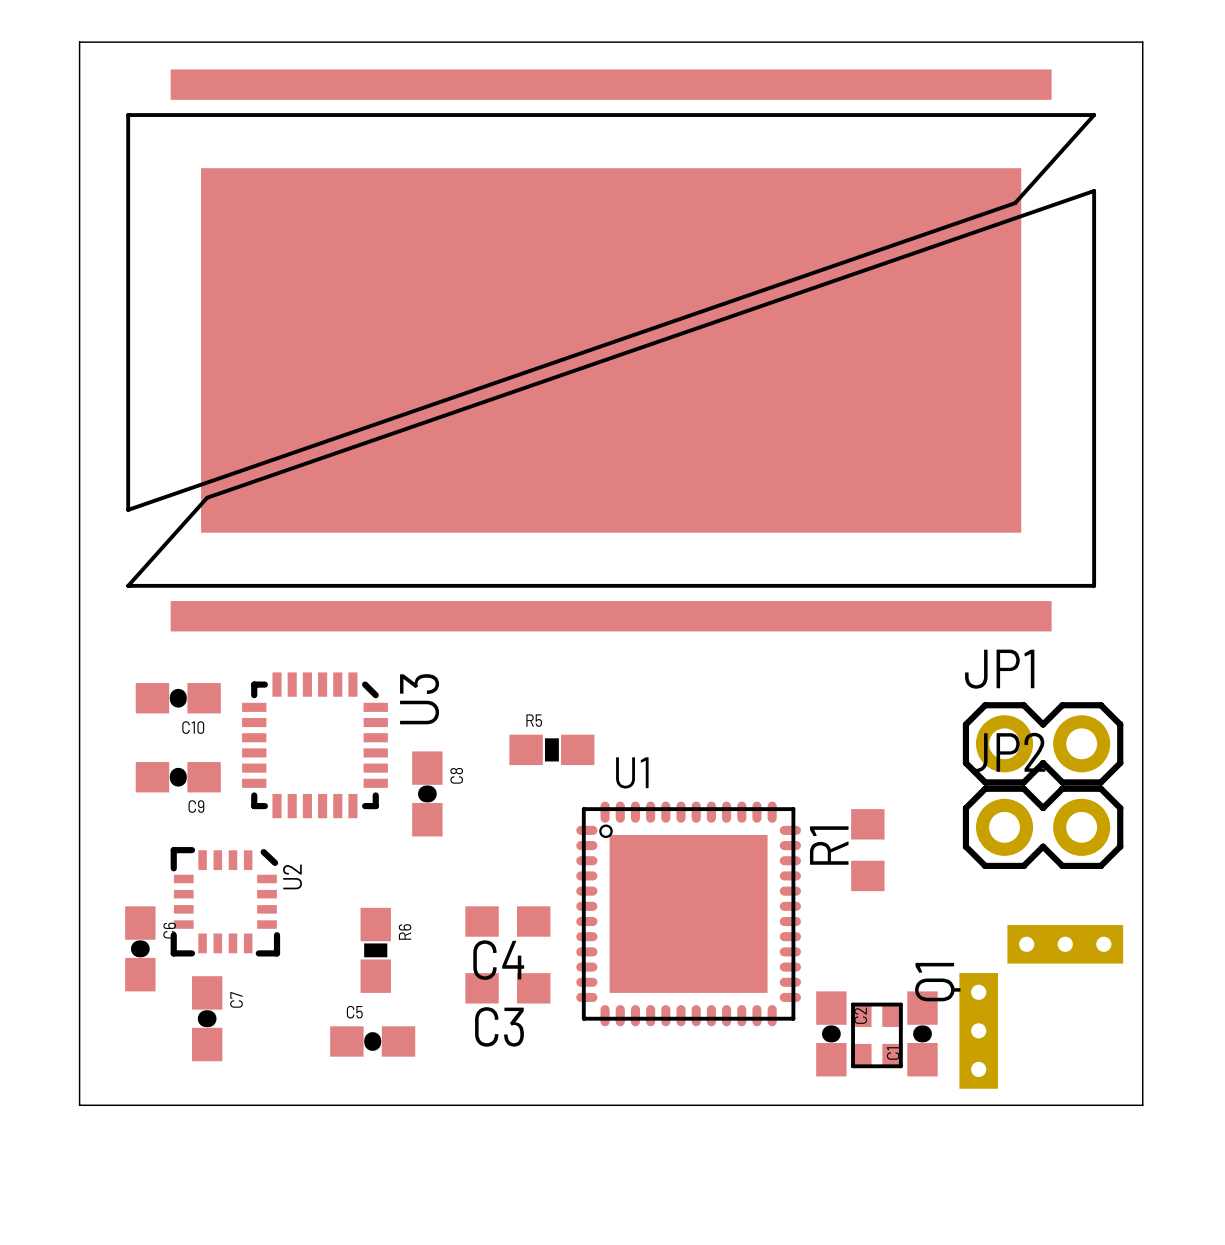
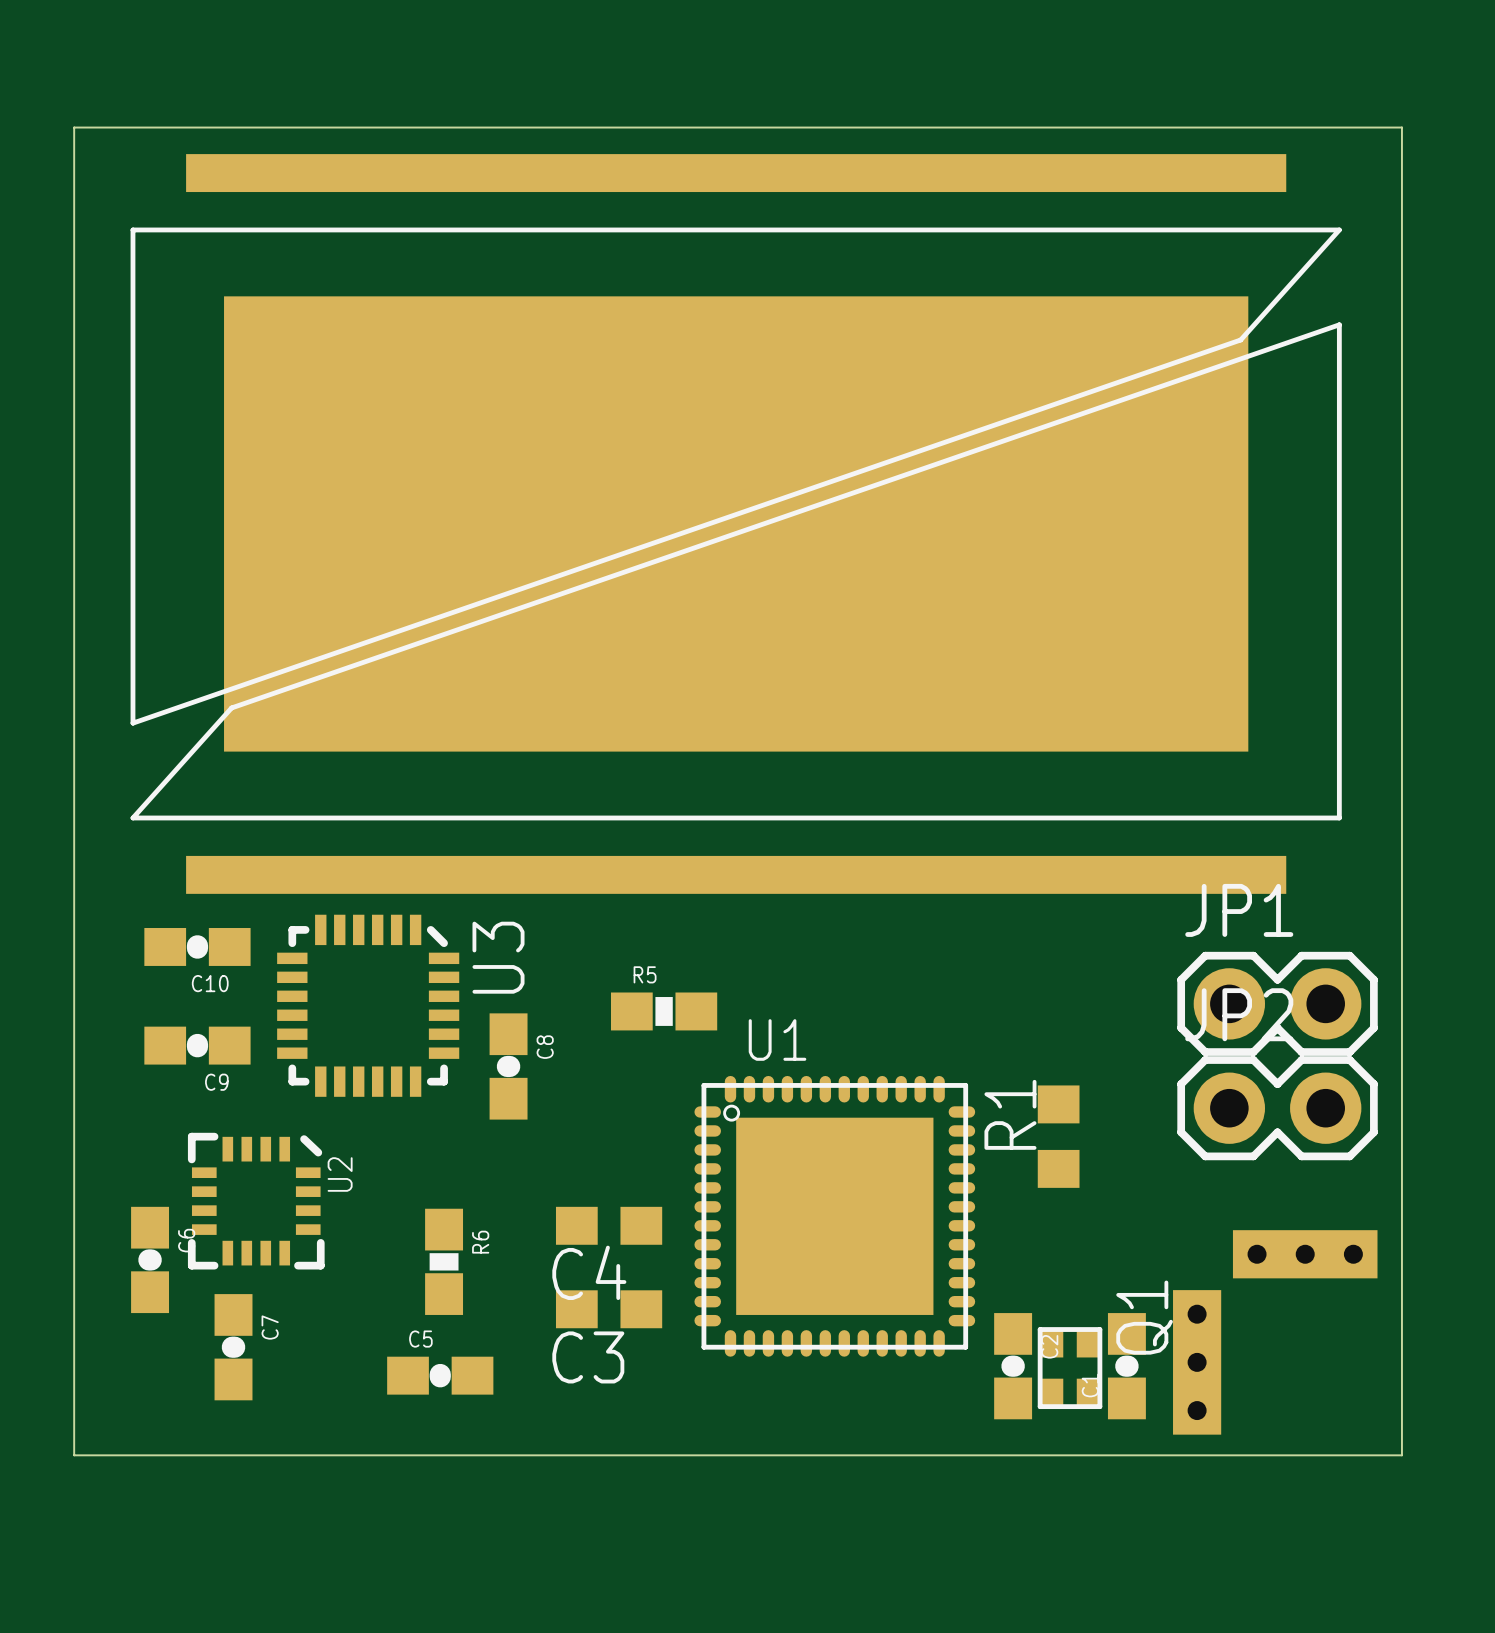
part footprint: [126, 69, 1097, 632] -> [130, 154, 1342, 894]

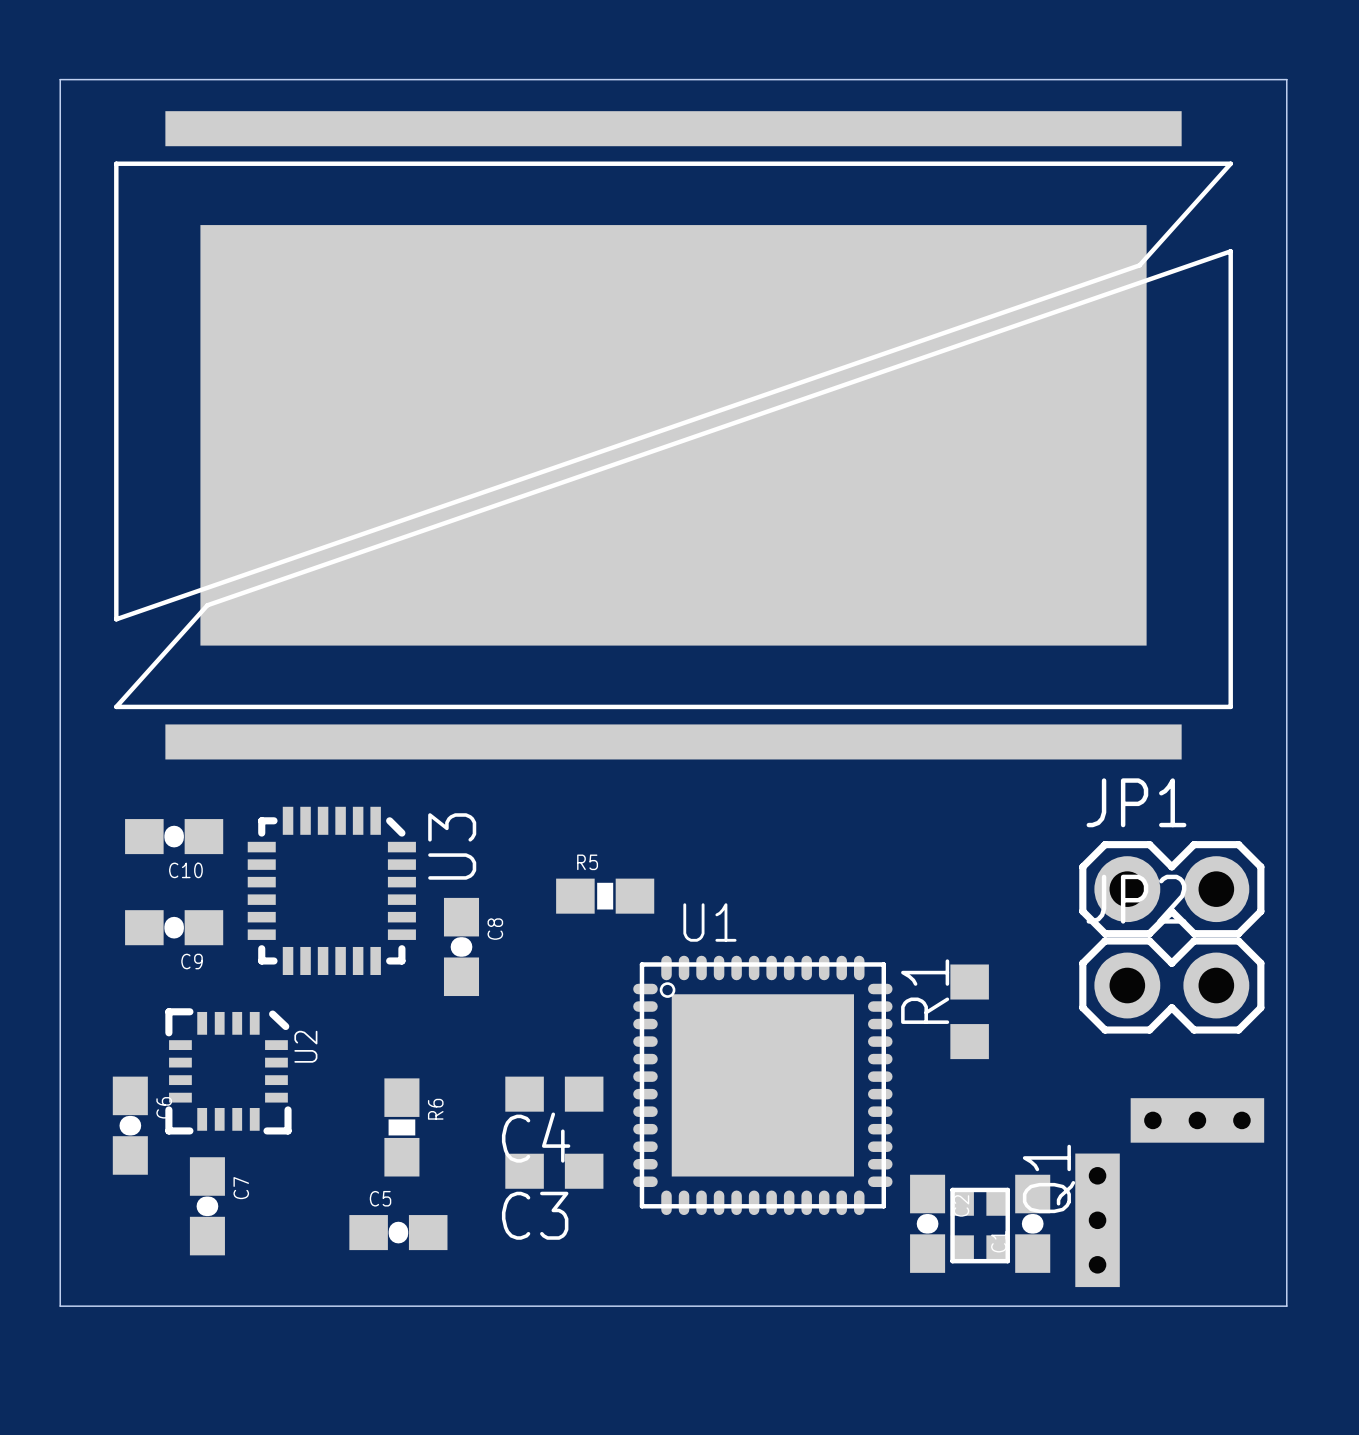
part footprint: [130, 154, 1342, 894] -> [114, 111, 1233, 760]

